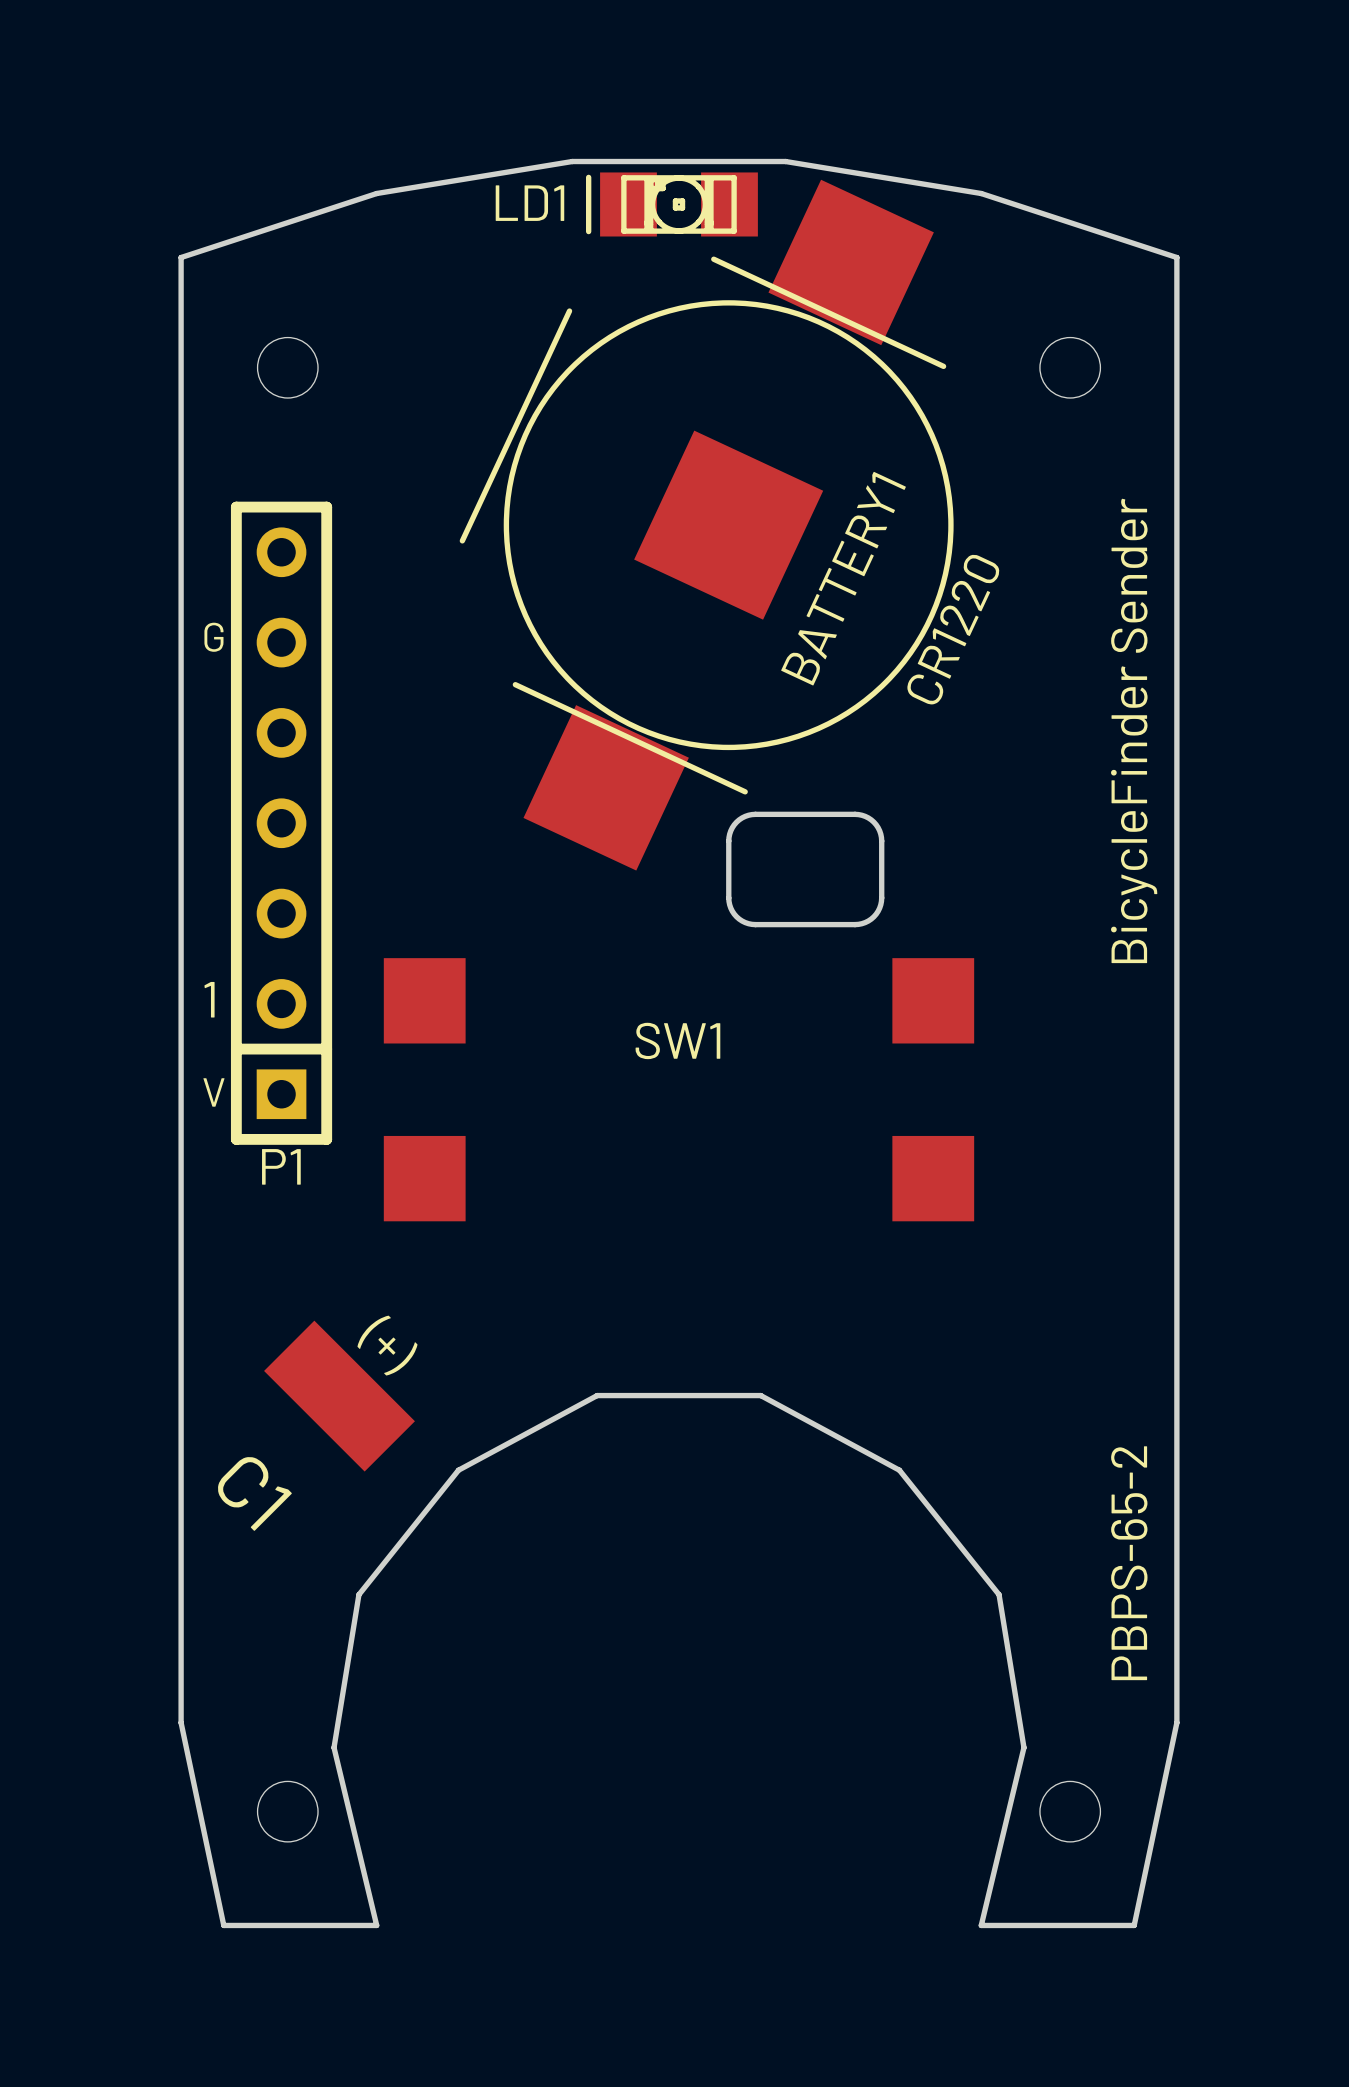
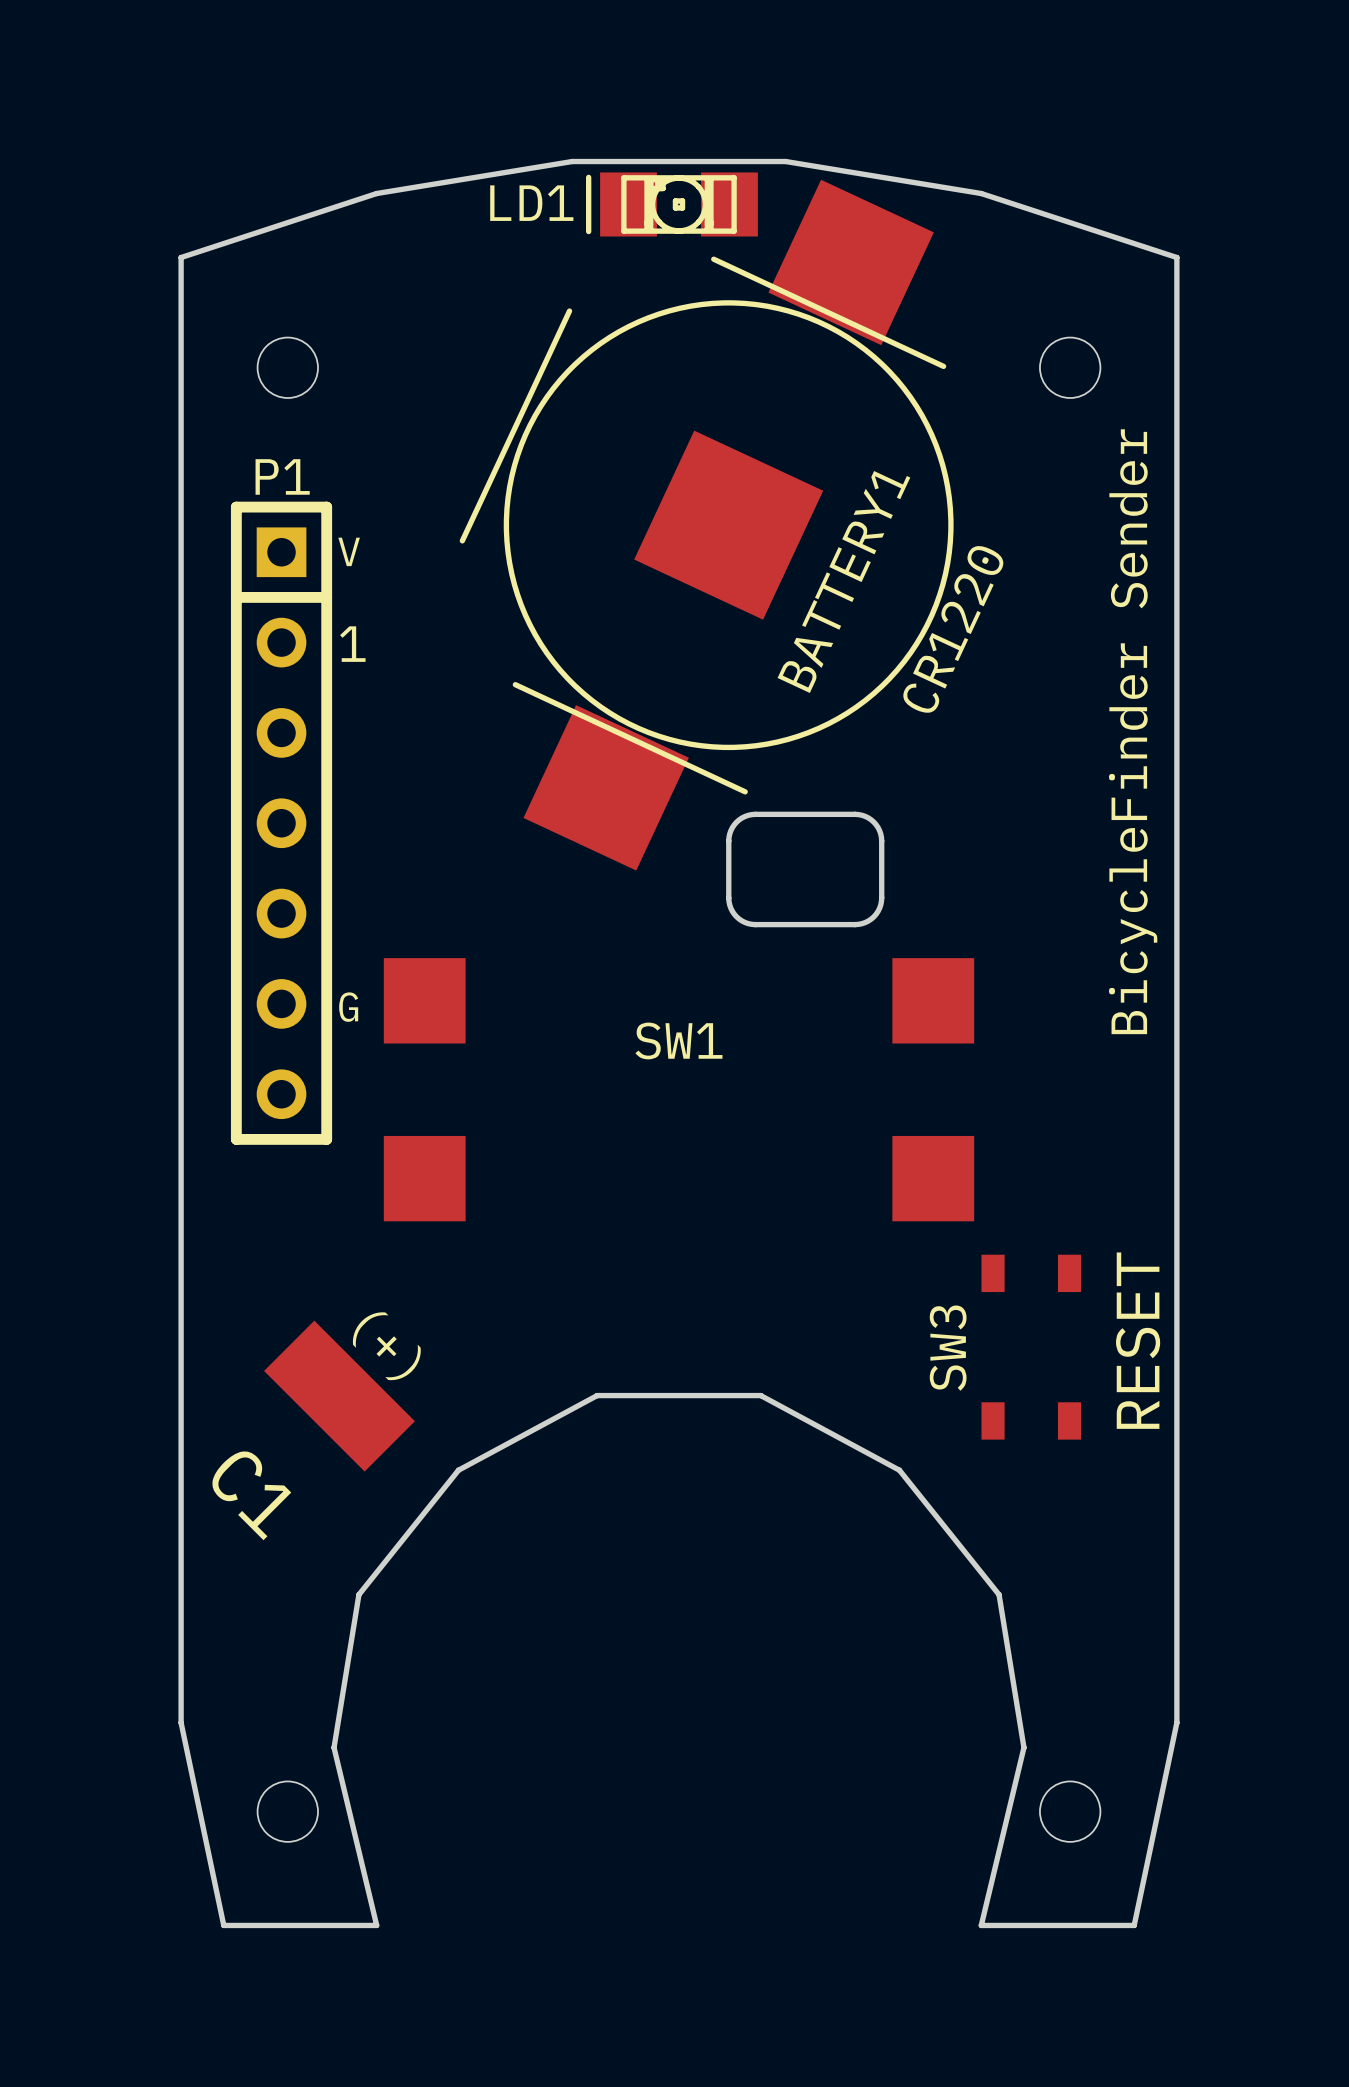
P1 rotation: 0° (281, 823) -> 180° (281, 823)
text: none -> RESET (1138, 1340)
SW3: none -> (1031, 1347)
PBPS-65-2 name: PBPS-65-2 (1129, 1563) -> none

